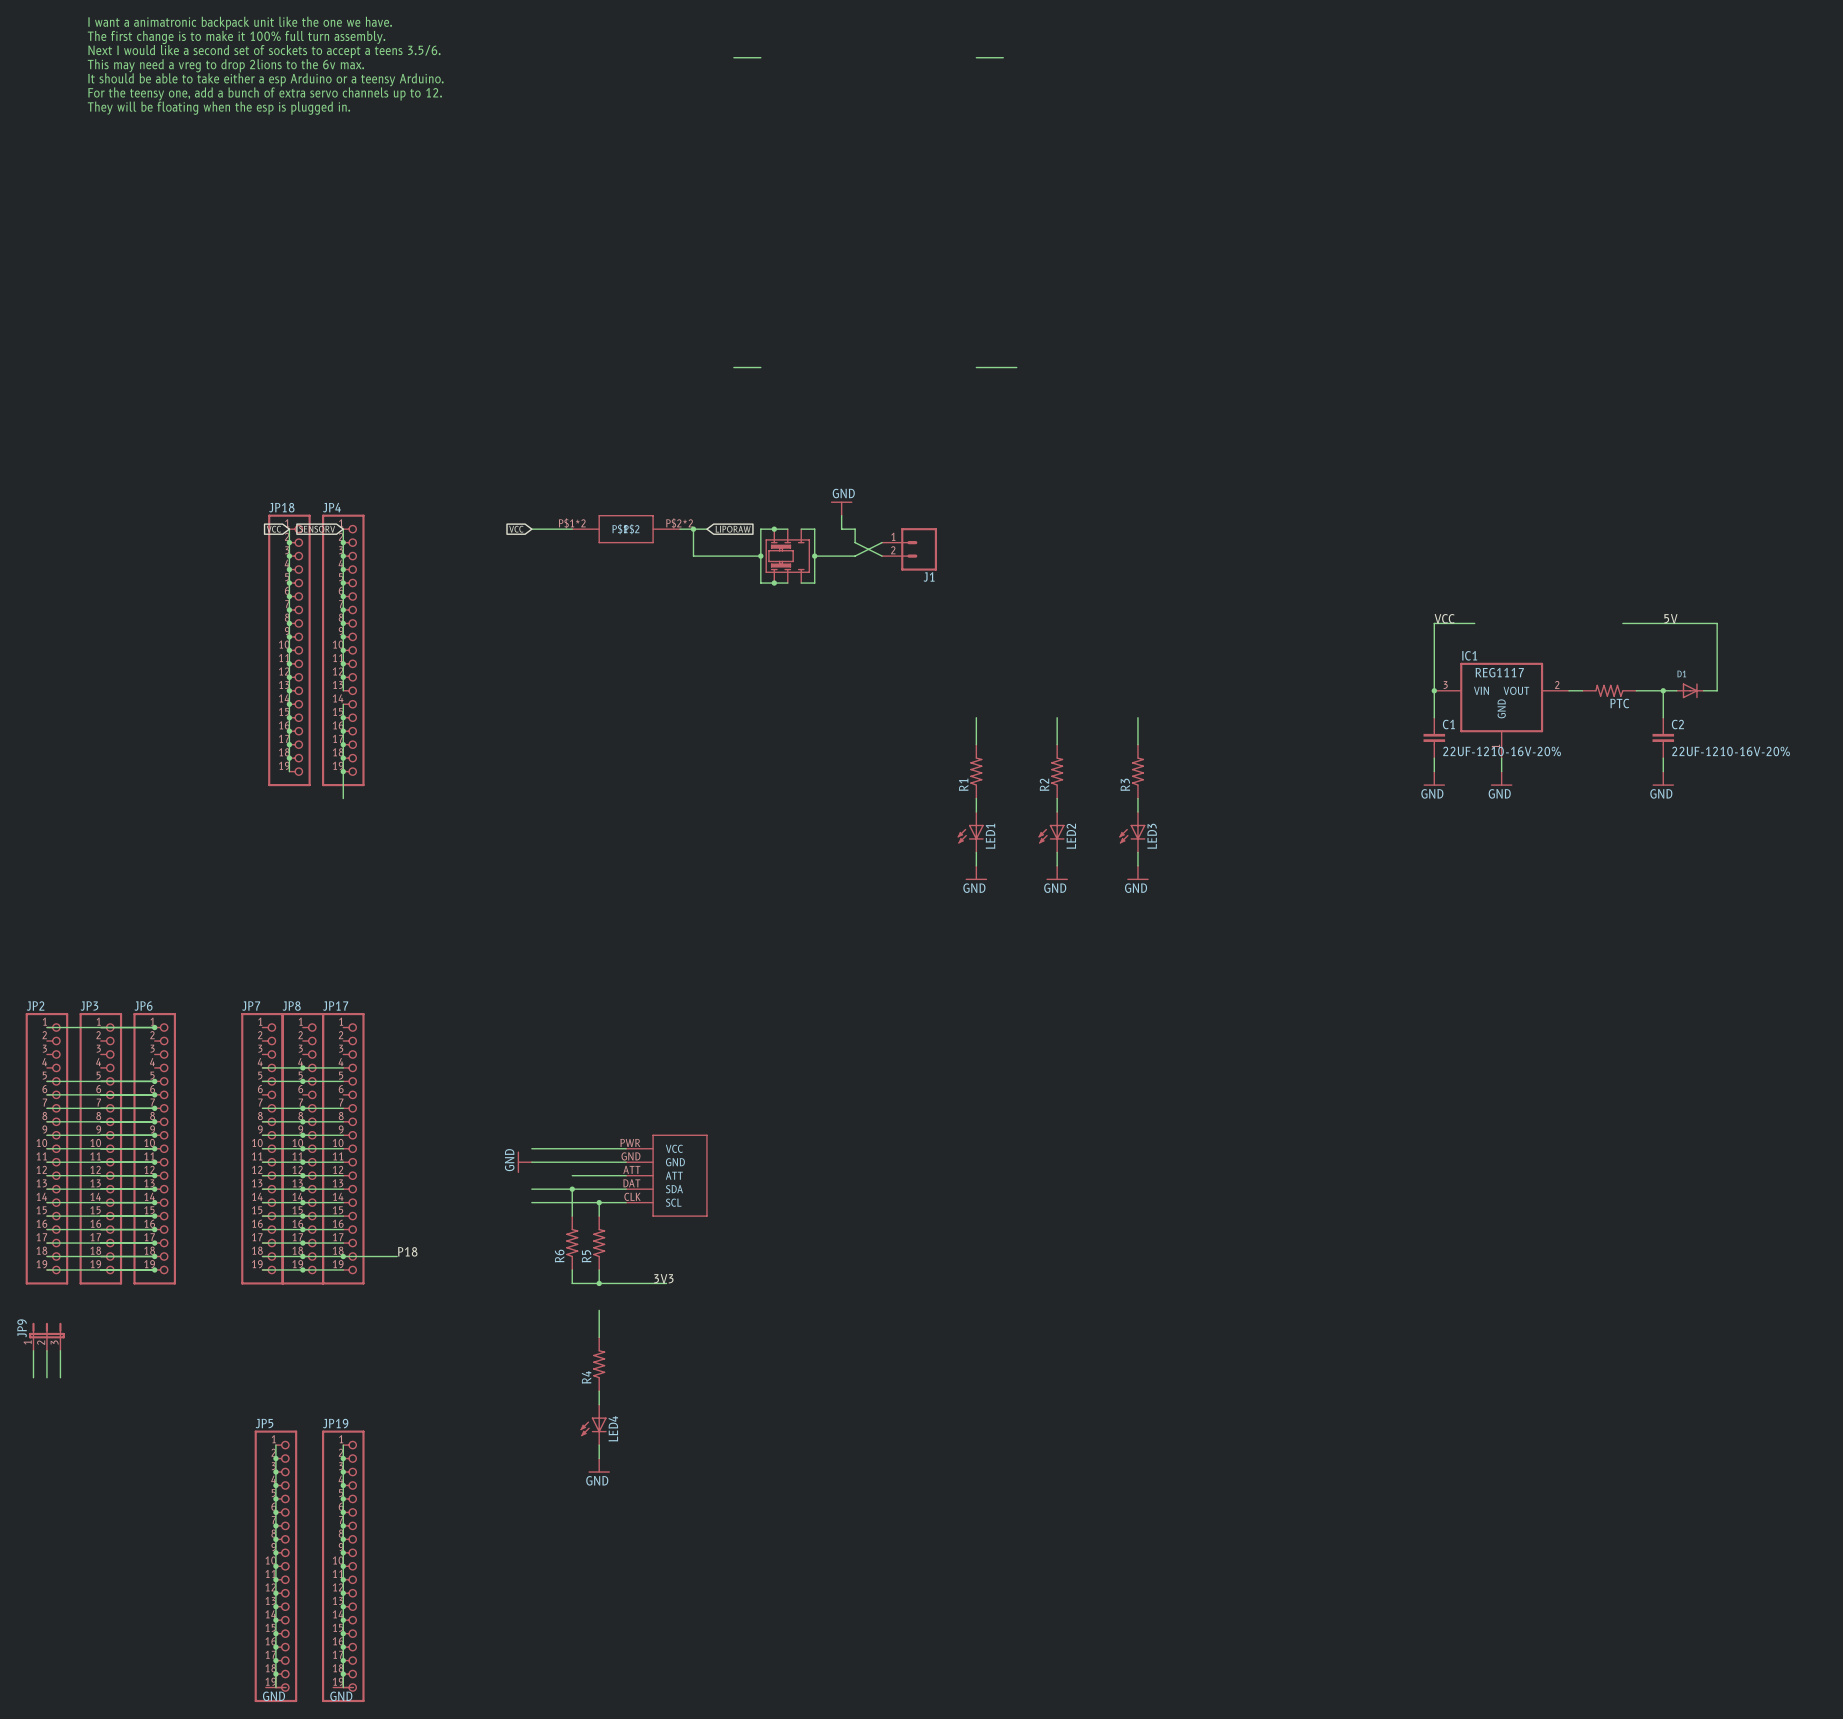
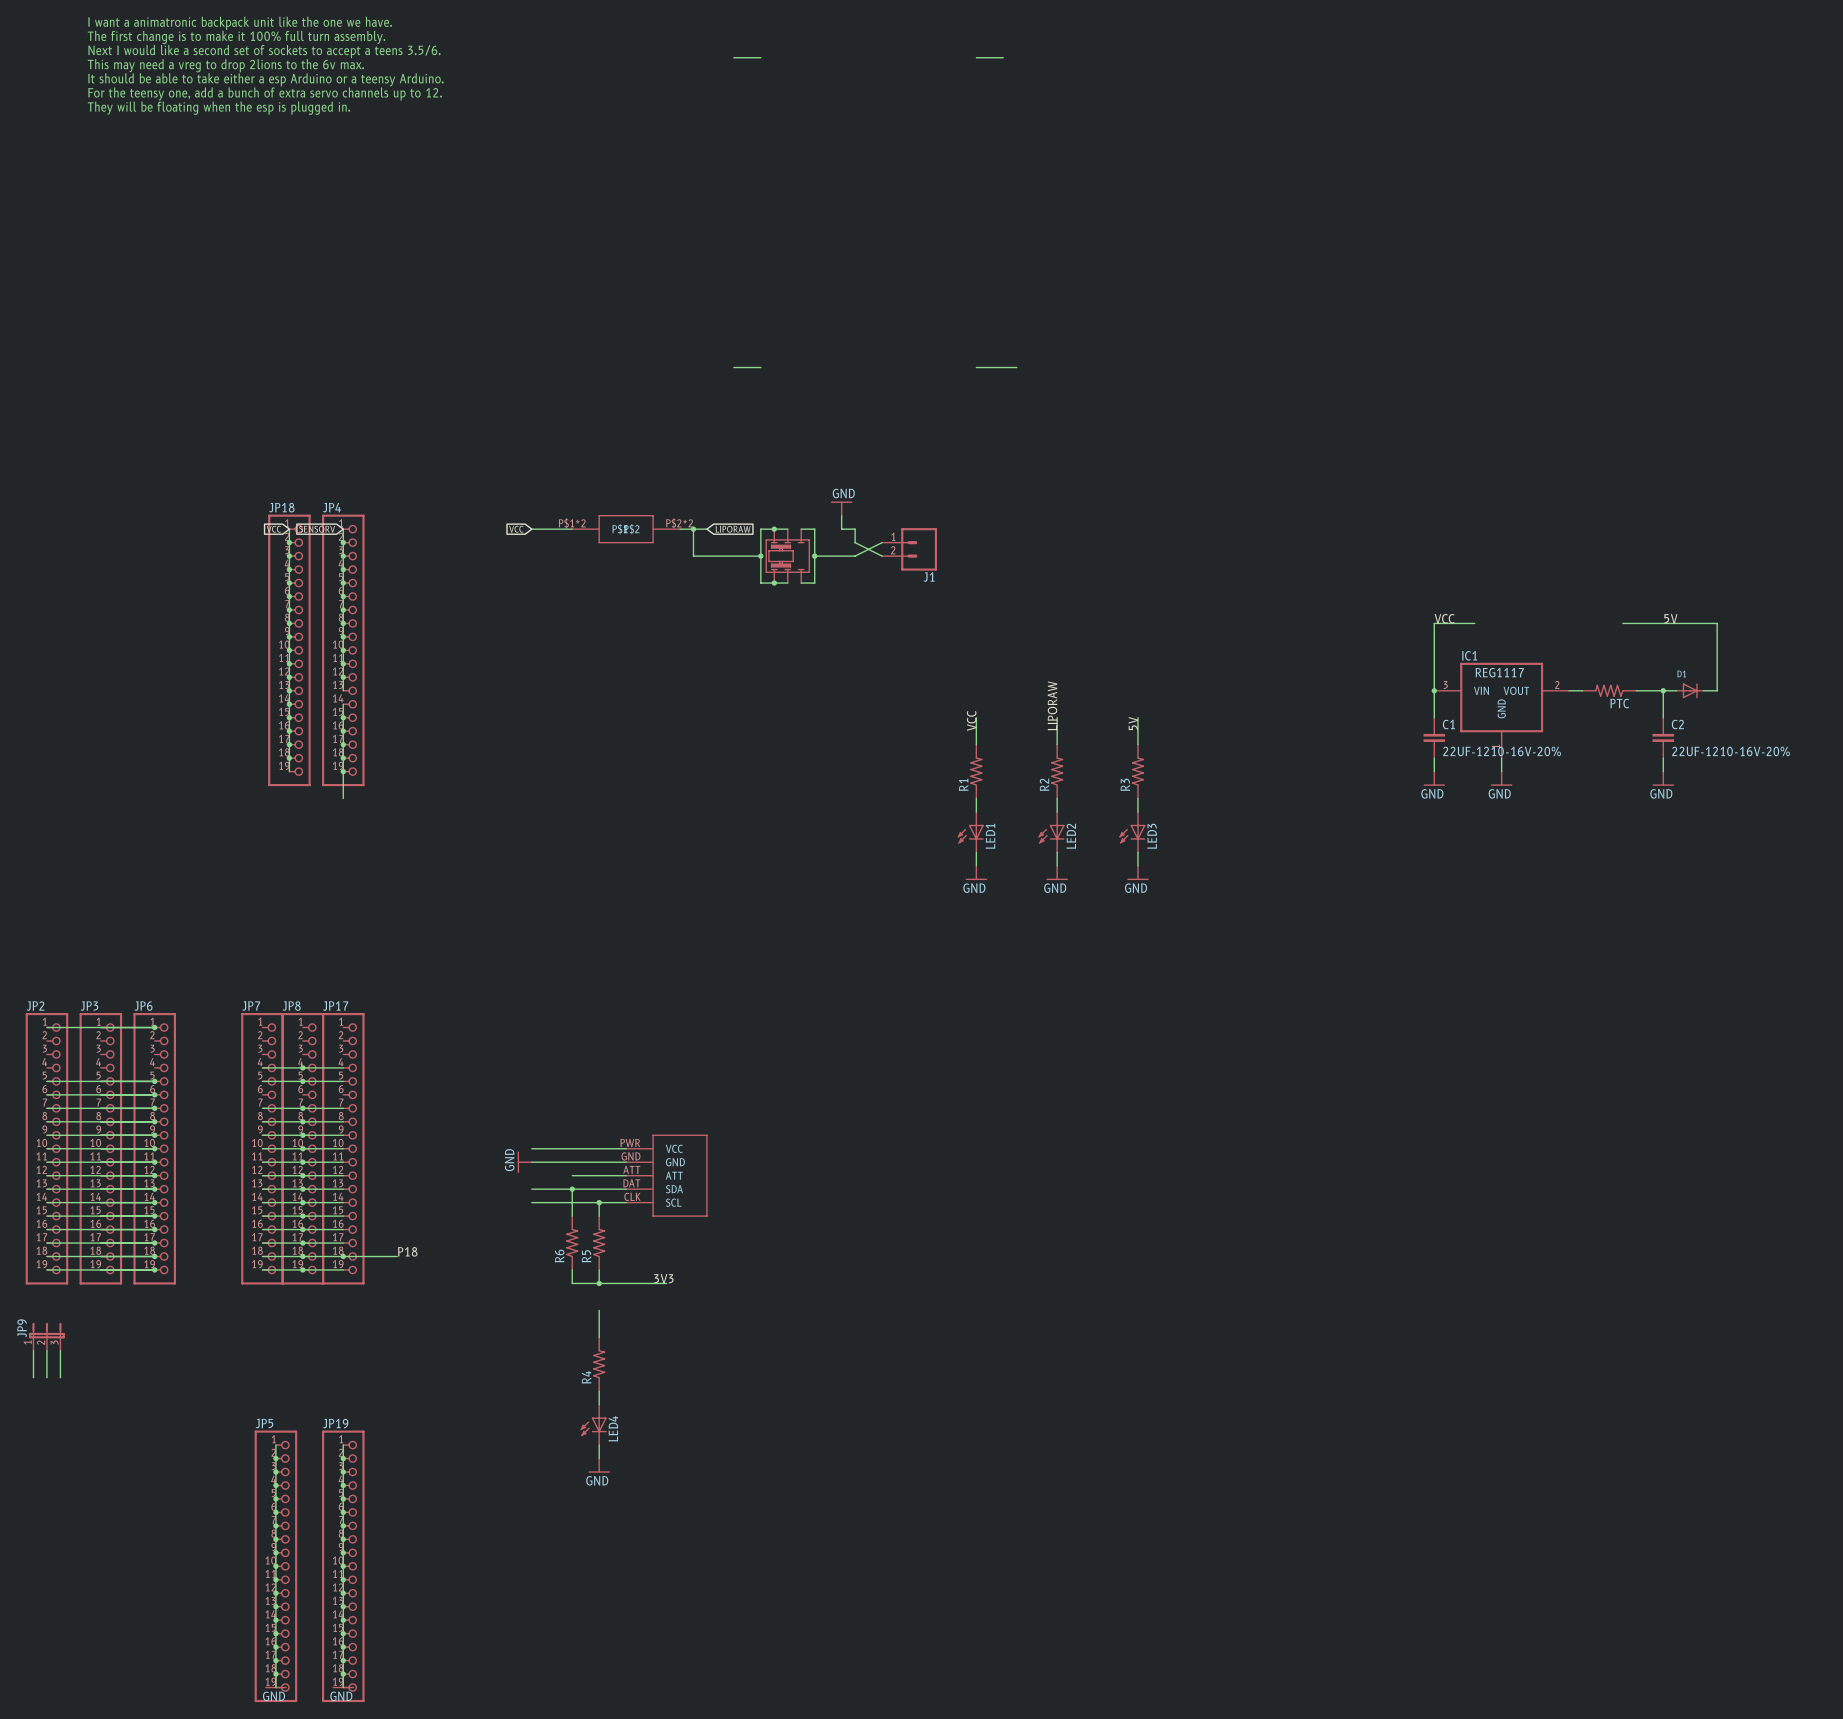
label: none -> LIPORAW (1052, 705)
label: none -> VCC (971, 720)
label: none -> 5V (1133, 723)

